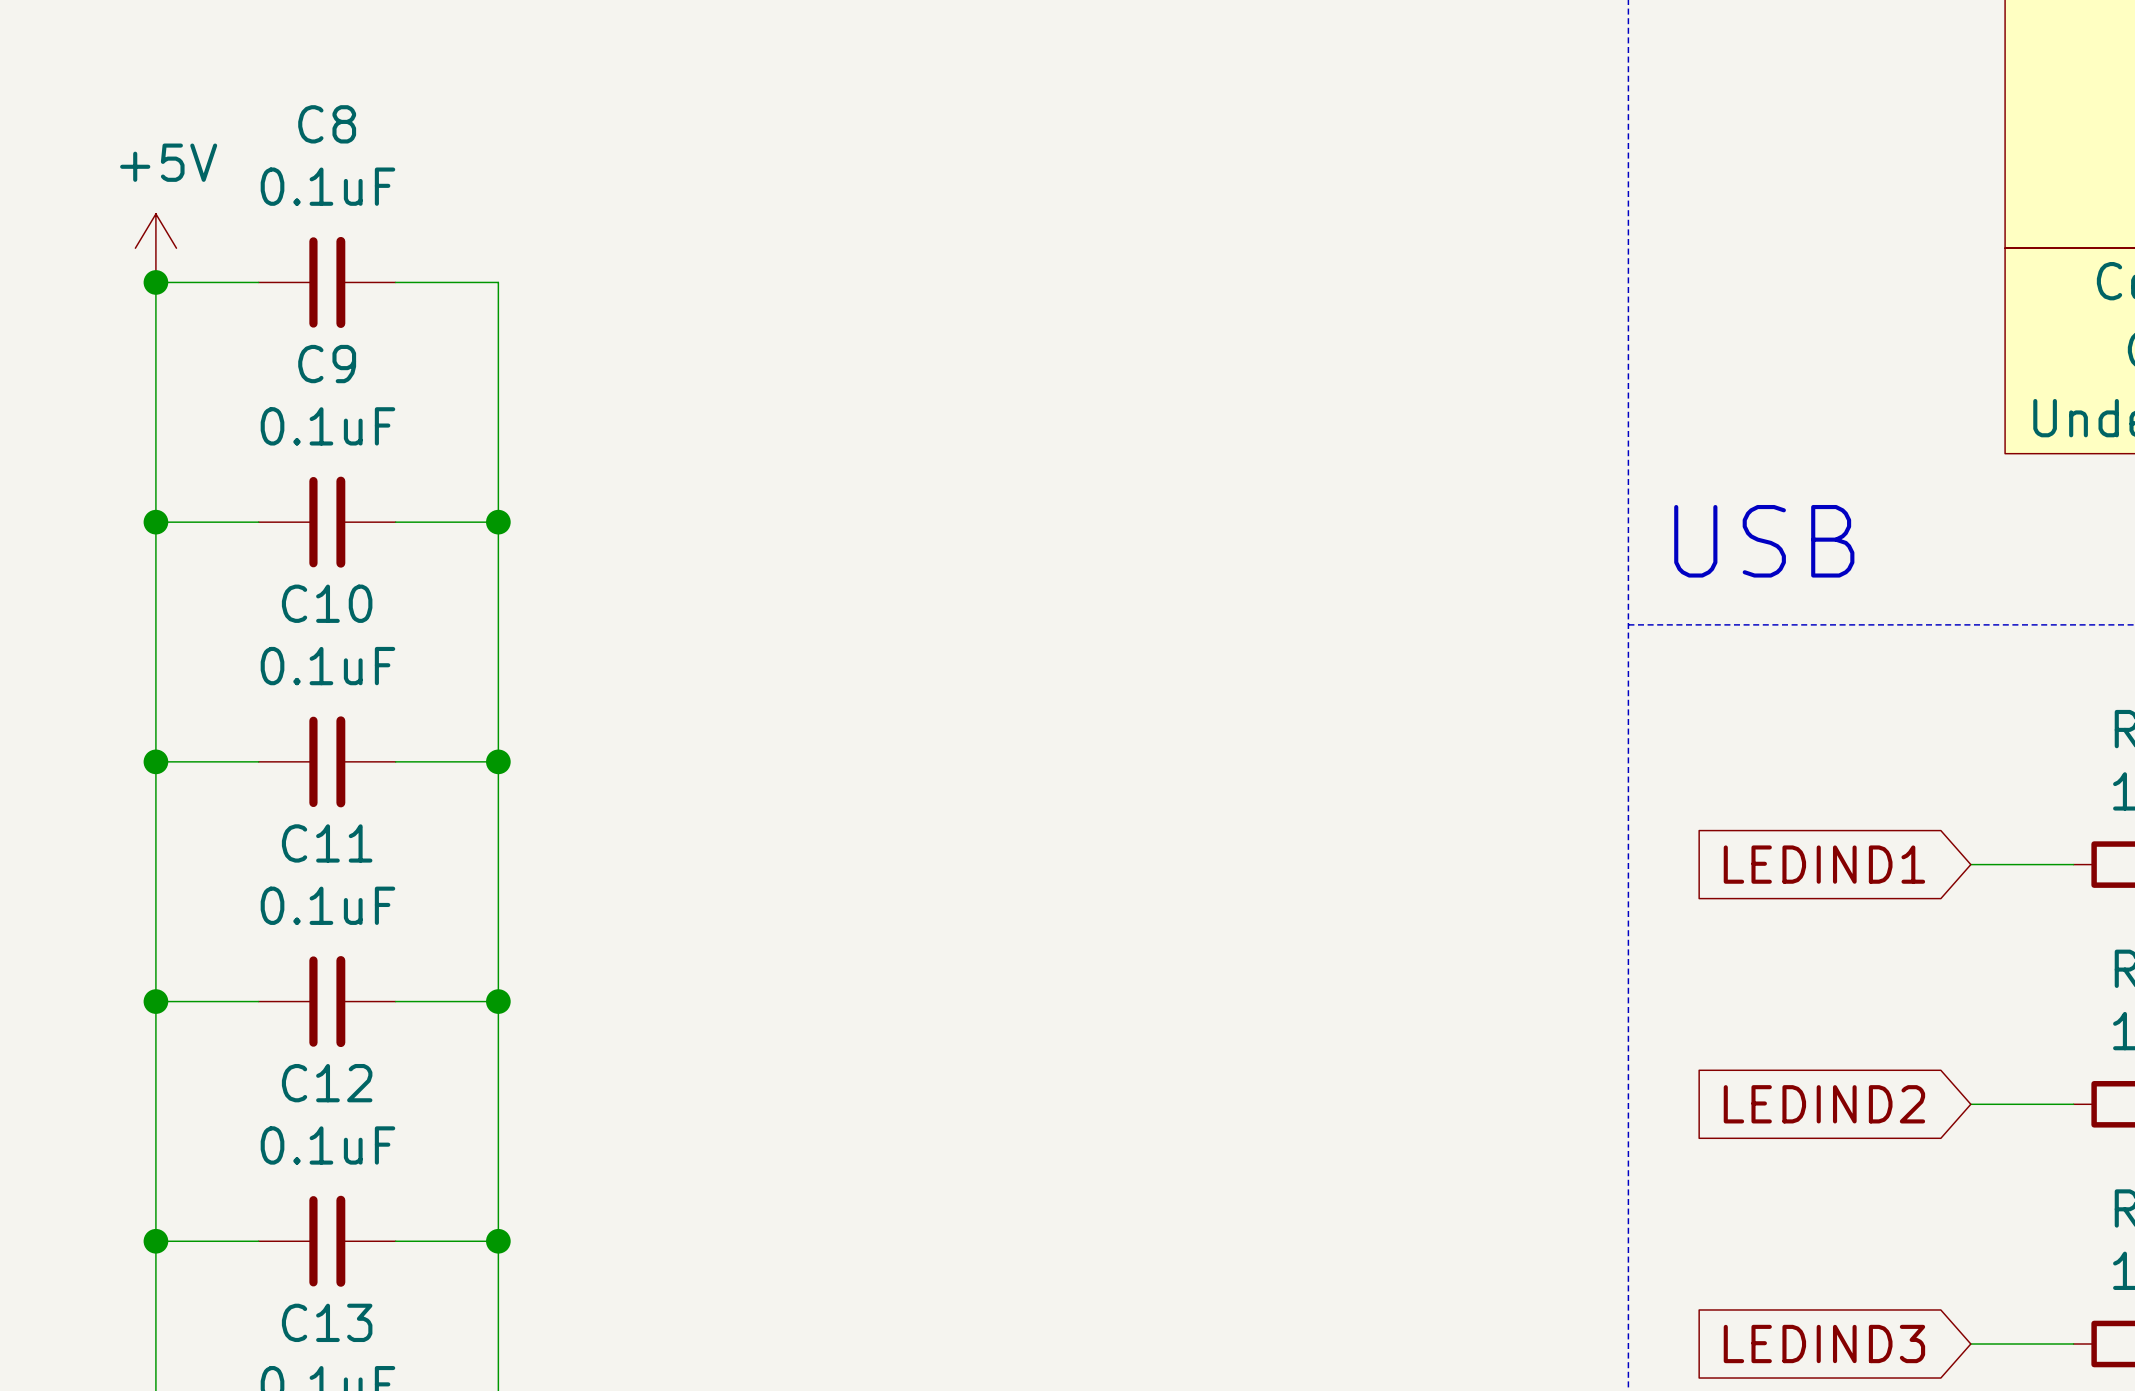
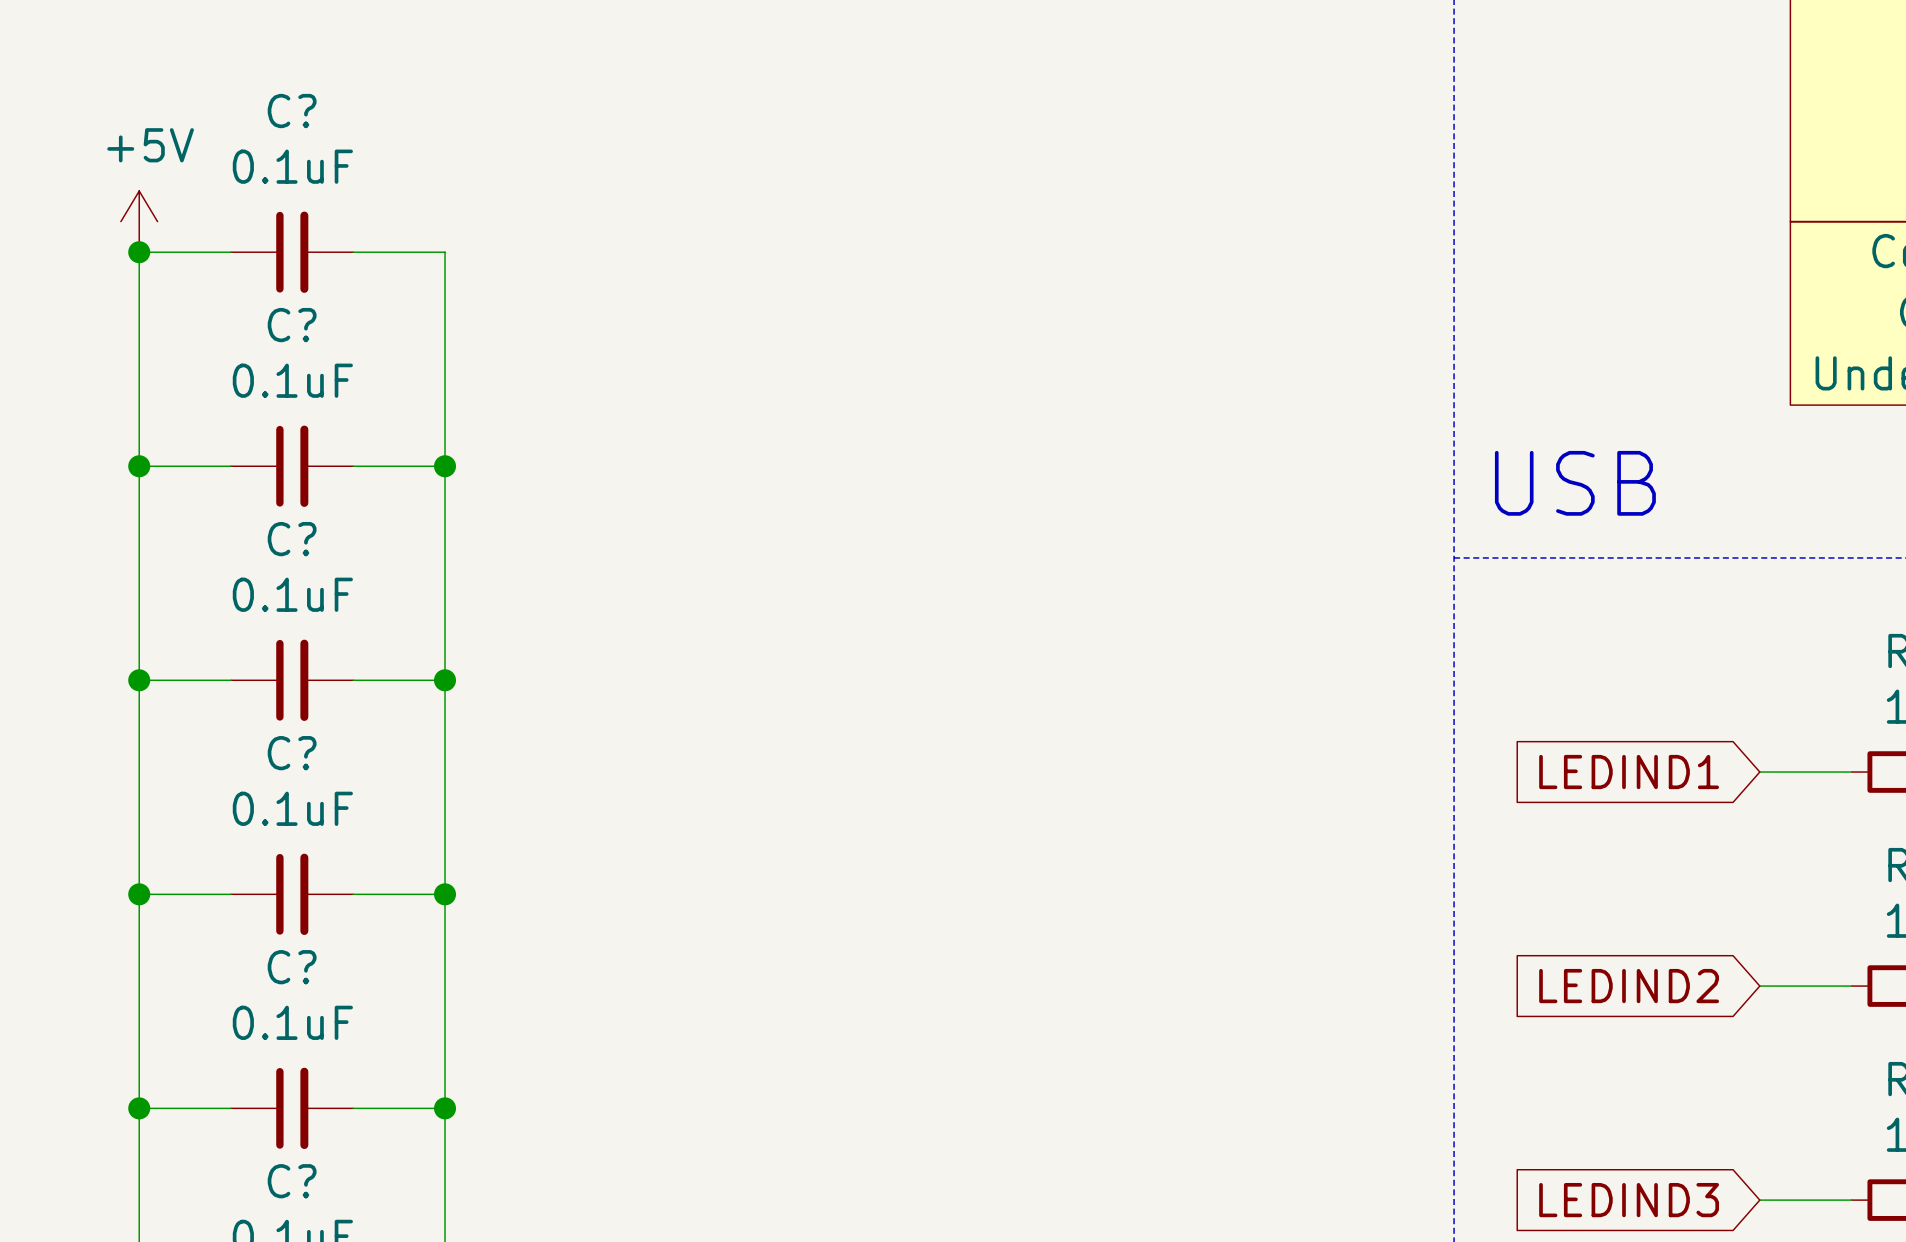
C8 name: C8 (327, 124) -> C? (292, 111)
C9 name: C9 (327, 364) -> C? (292, 325)
C10 name: C10 (327, 603) -> C? (292, 539)
C11 name: C11 (327, 843) -> C? (292, 753)
C12 name: C12 (327, 1083) -> C? (292, 967)
C13 name: C13 (327, 1322) -> C? (292, 1181)

